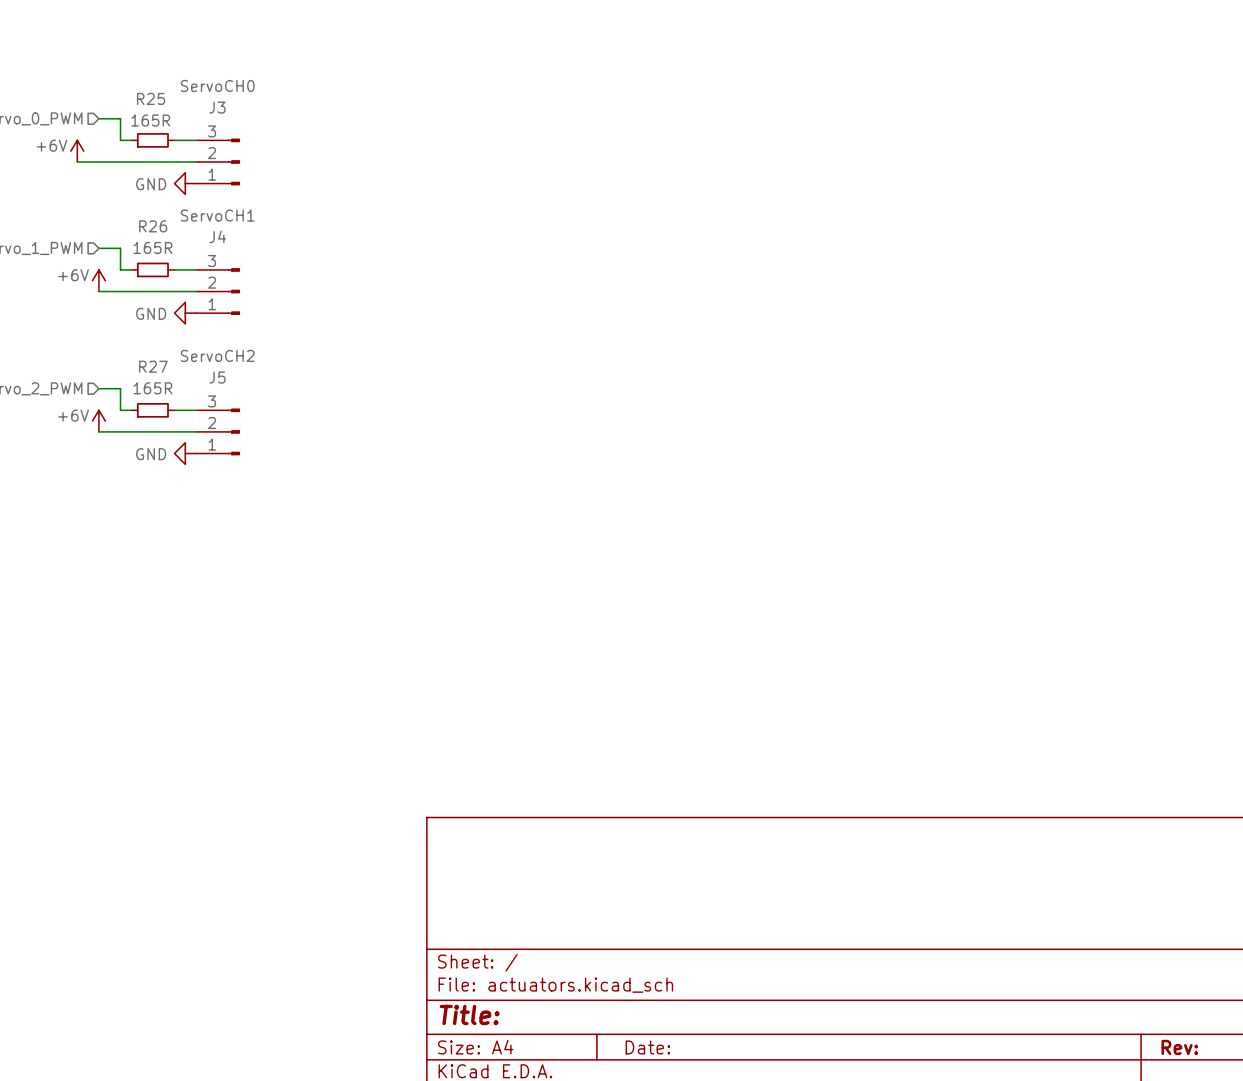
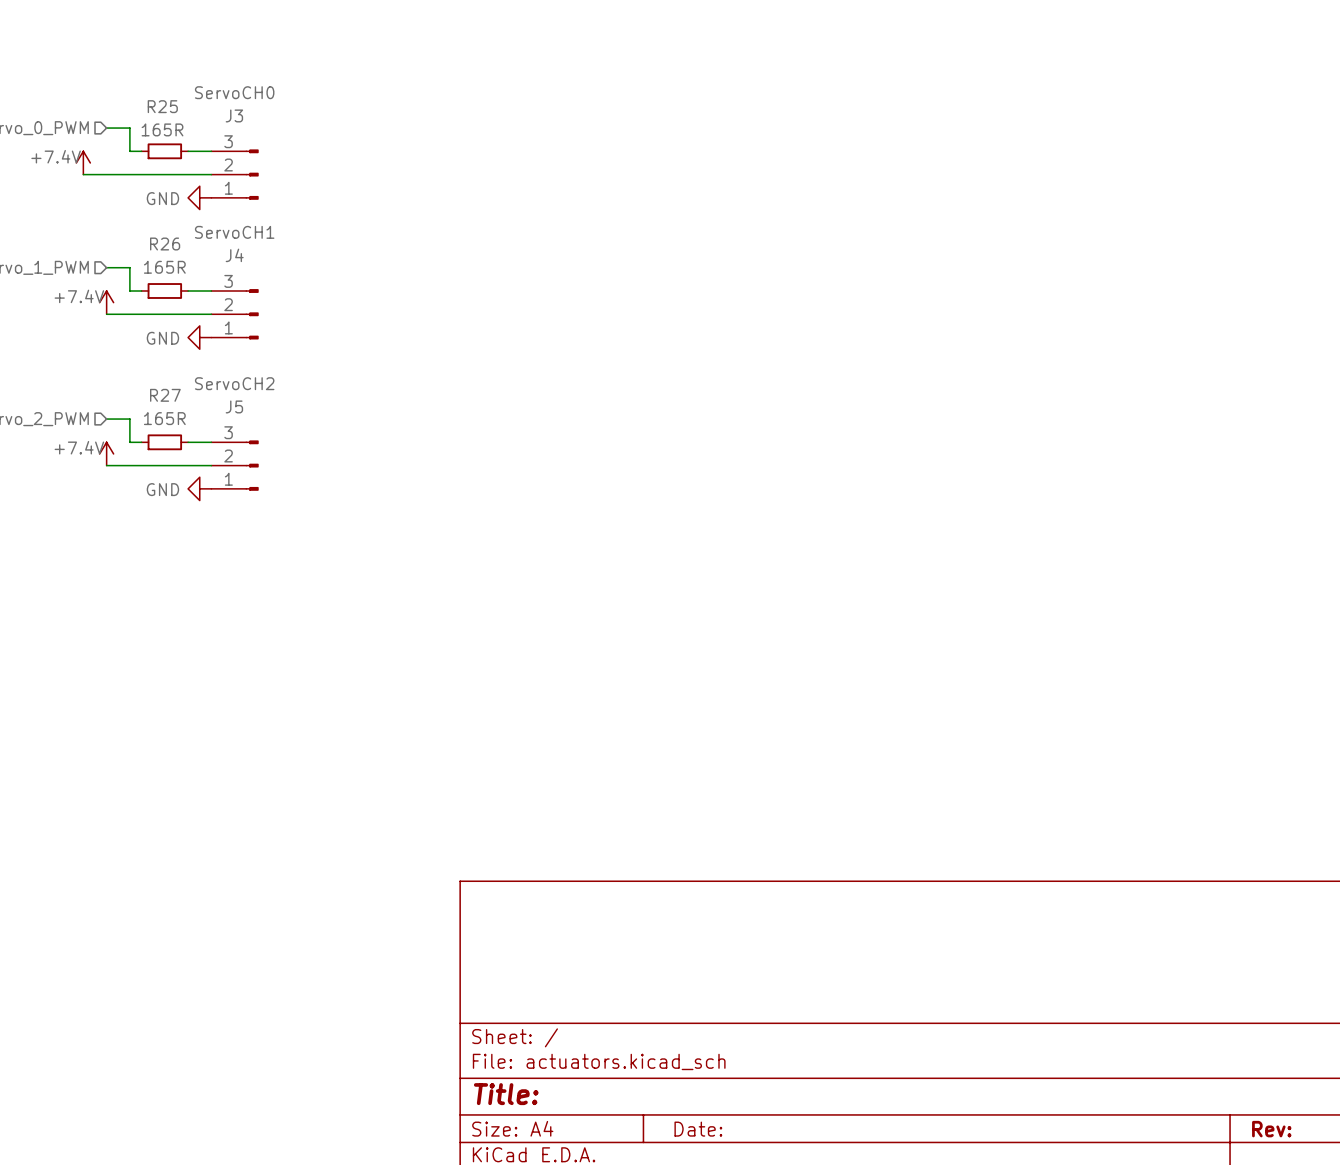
power symbol: +6V (77, 151) -> +7.4V (83, 162)
power symbol: +6V (98, 280) -> +7.4V (106, 302)
power symbol: +6V (98, 421) -> +7.4V (106, 453)

